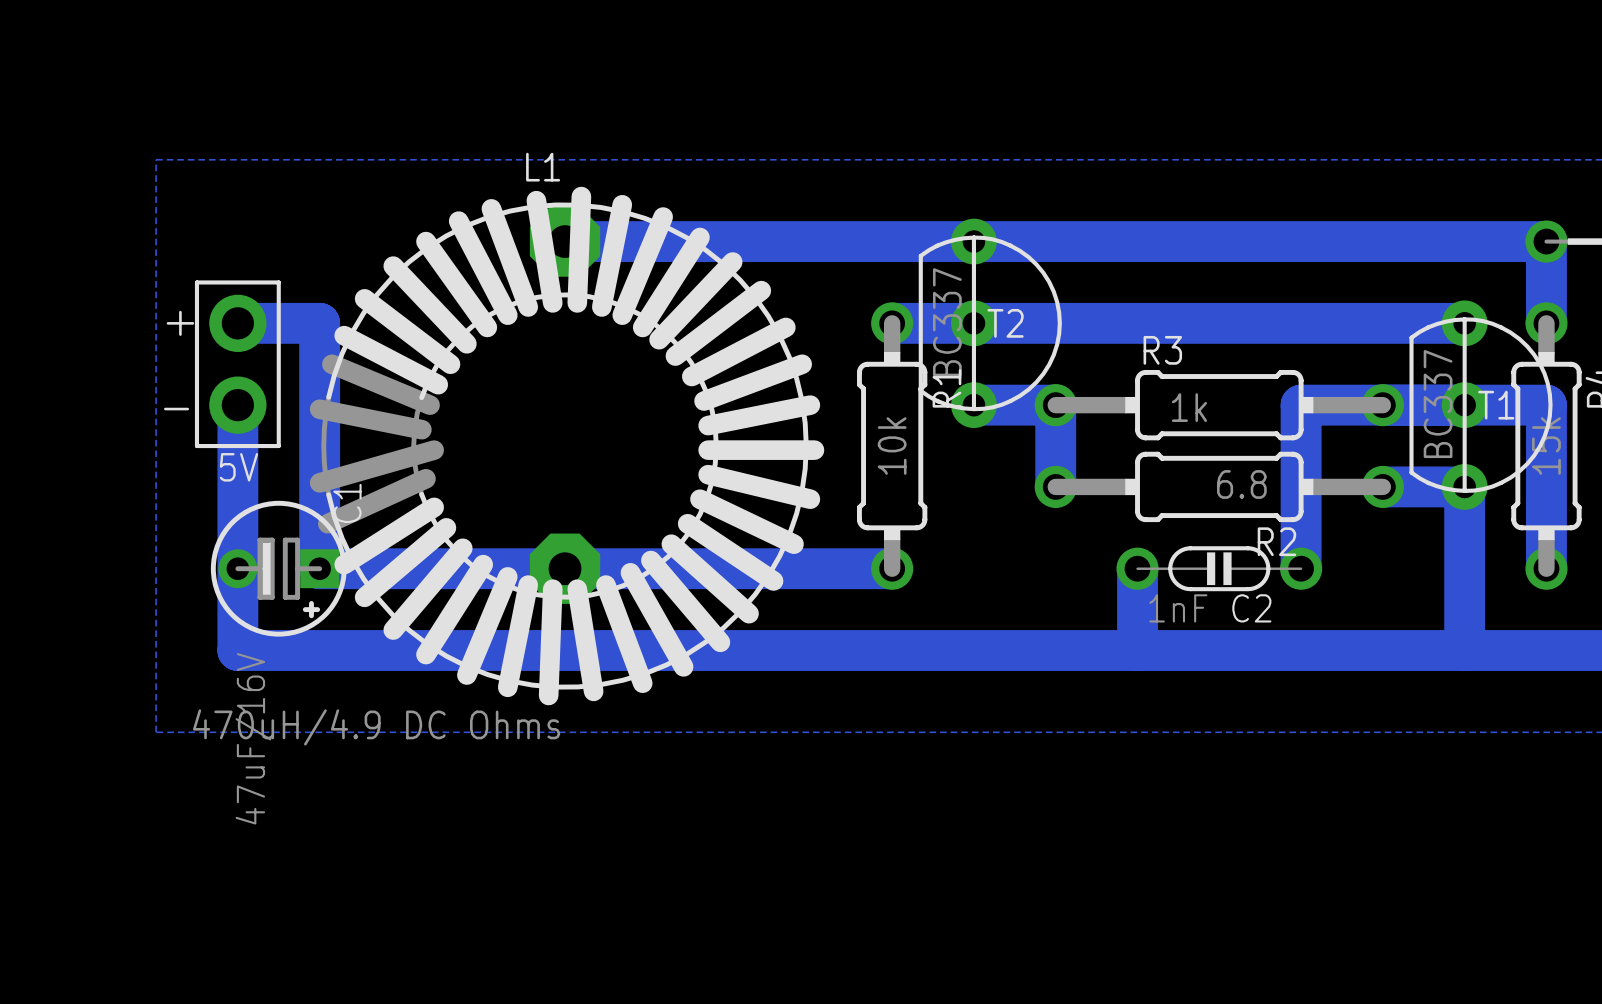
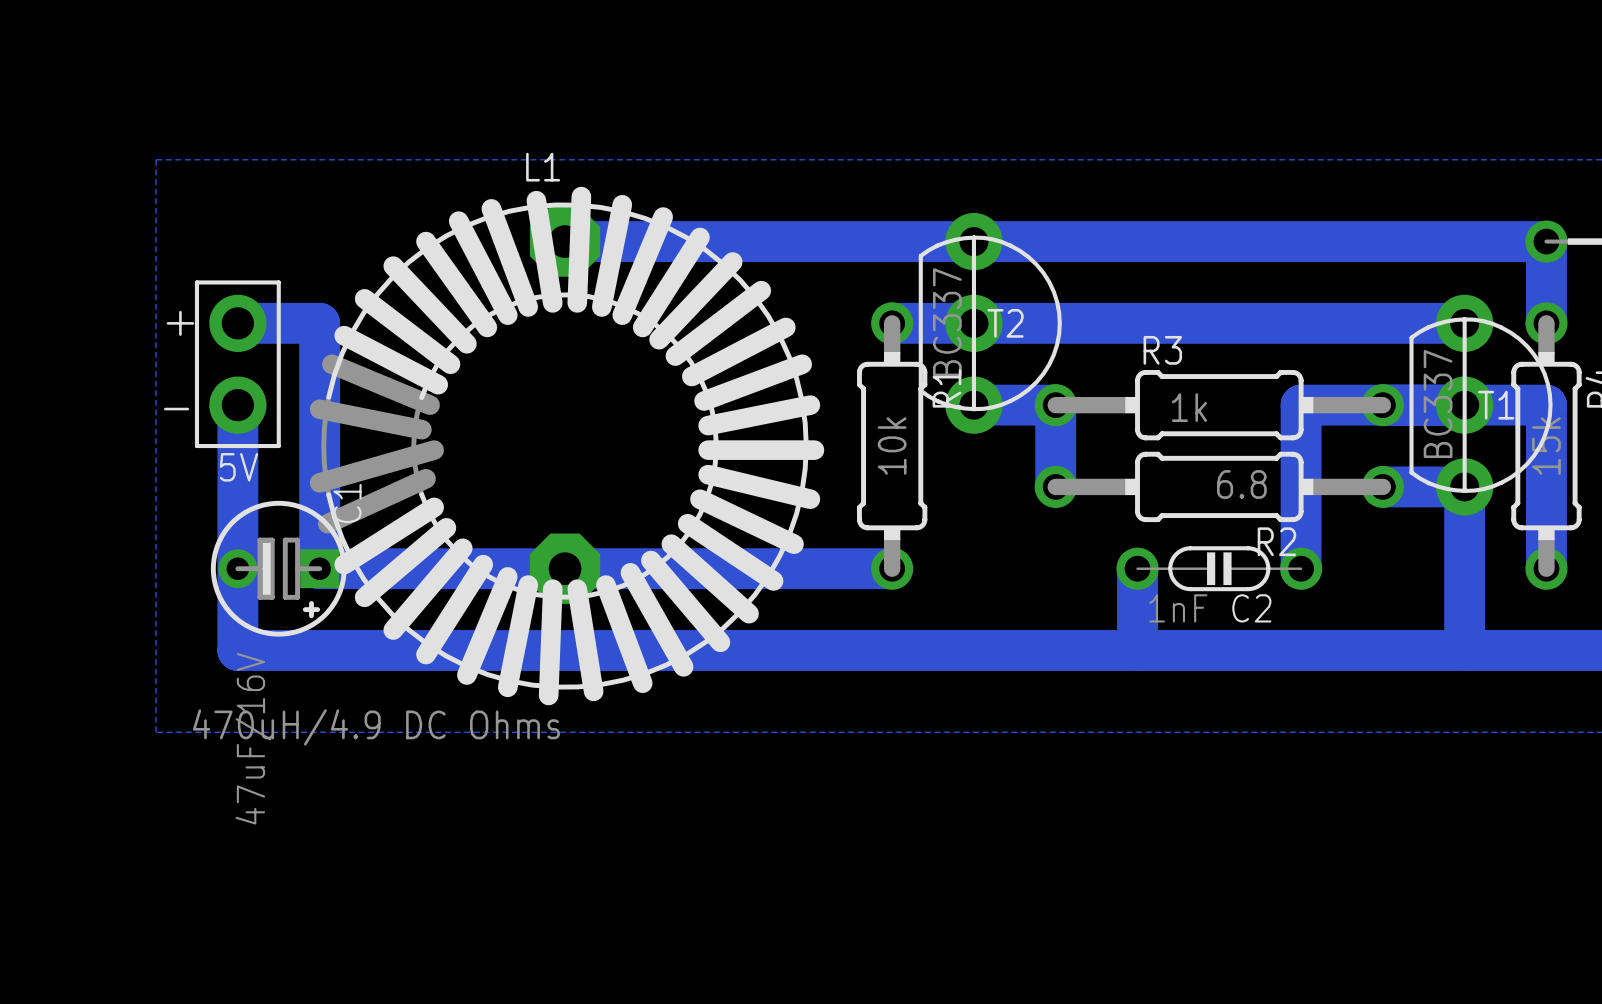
T2 footprint: [918, 218, 1062, 429] -> [918, 212, 1062, 434]
T1 footprint: [1409, 300, 1553, 510] -> [1409, 294, 1553, 516]

